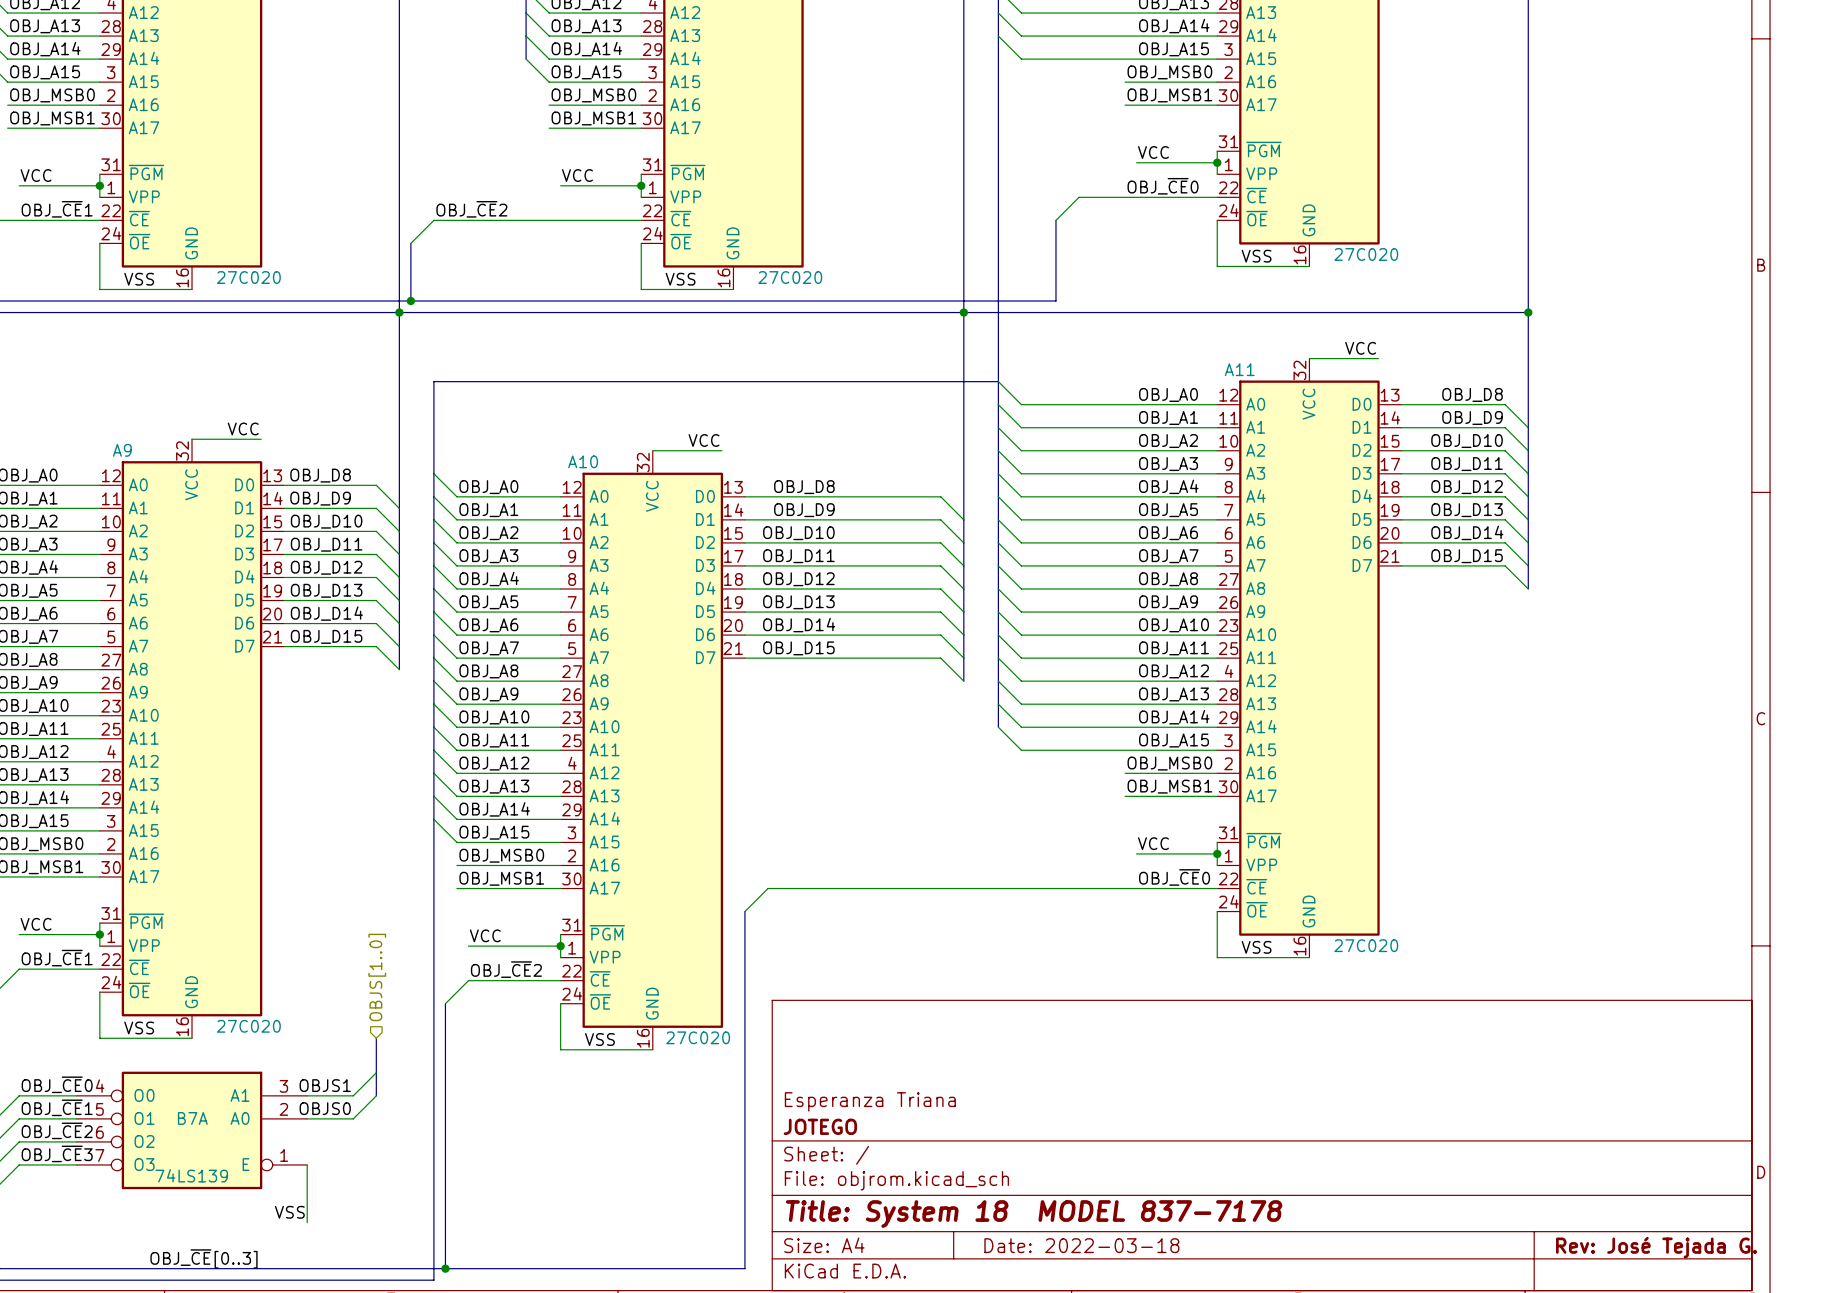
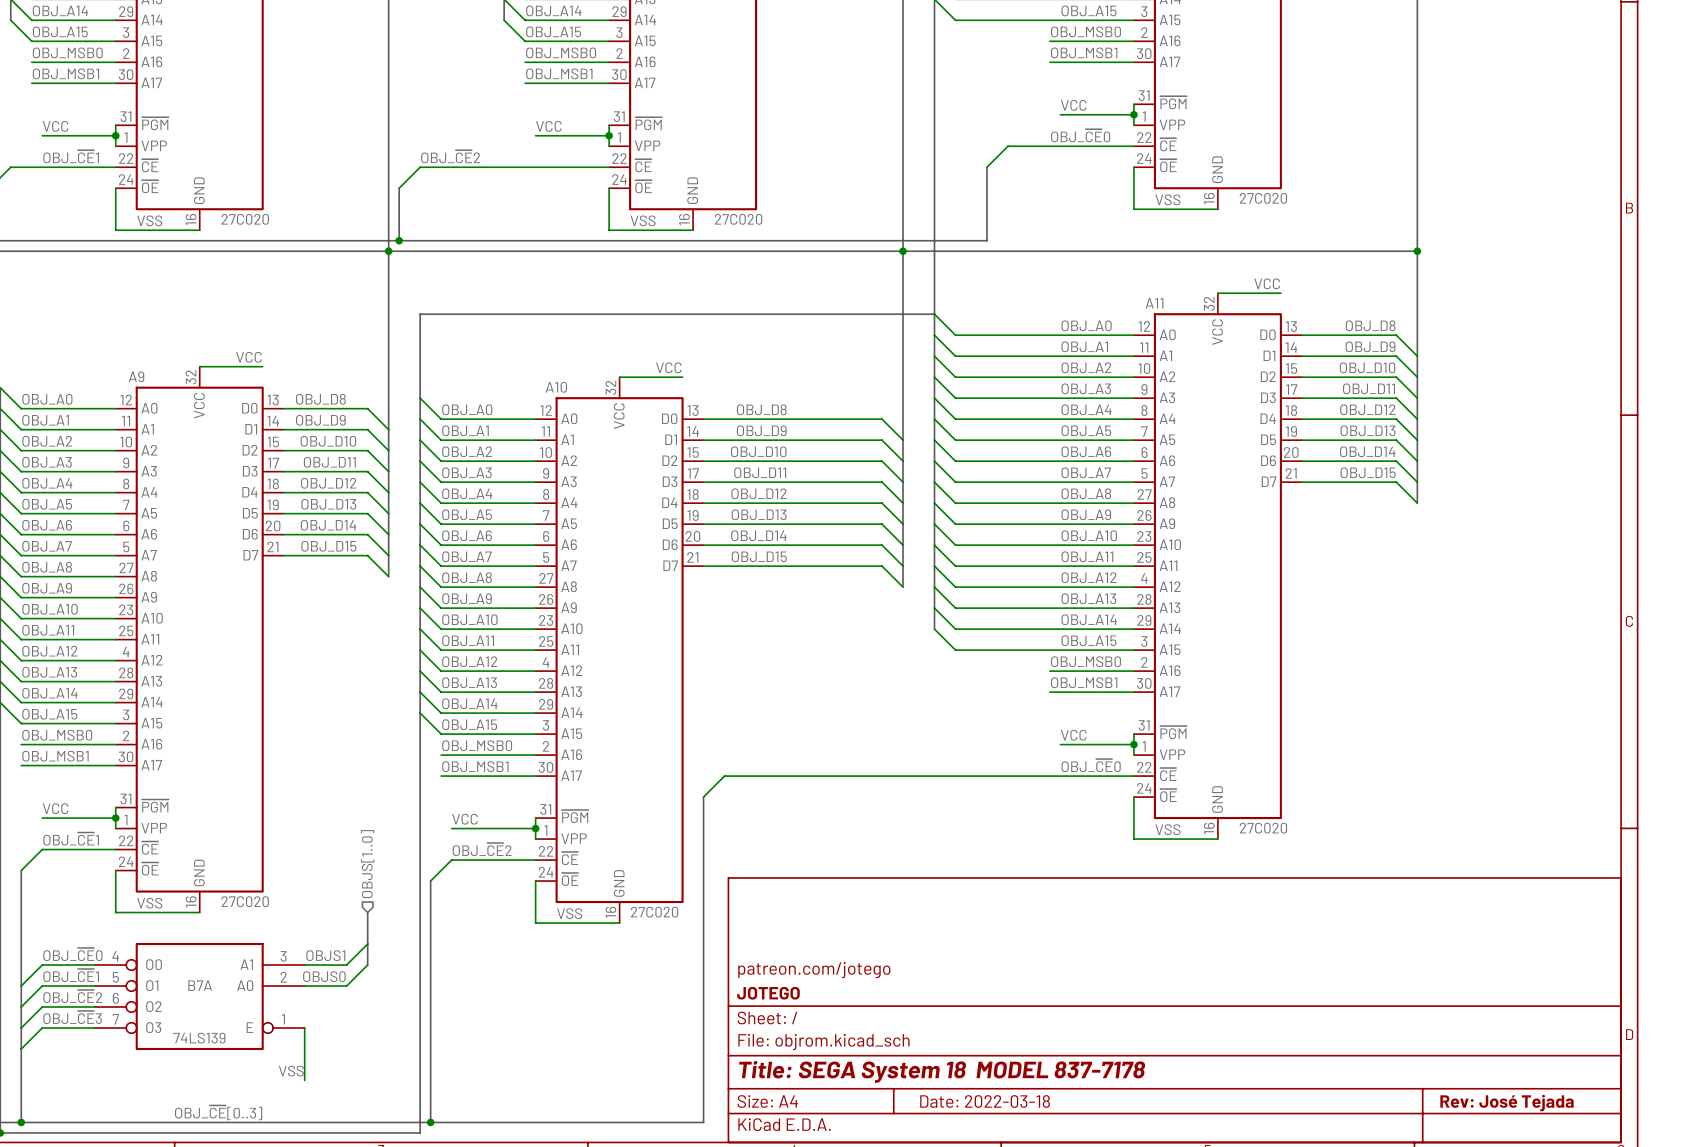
title block: Esperanza Triana (870, 1101) -> patreon.com/jotego (814, 970)
title block: Title: System 18 MODEL 837-7178 (1034, 1214) -> Title: SEGA System 18 MODEL 837-7178 (942, 1071)
title block: Rev: José Tejada G. (1656, 1247) -> Rev: José Tejada (1507, 1103)

